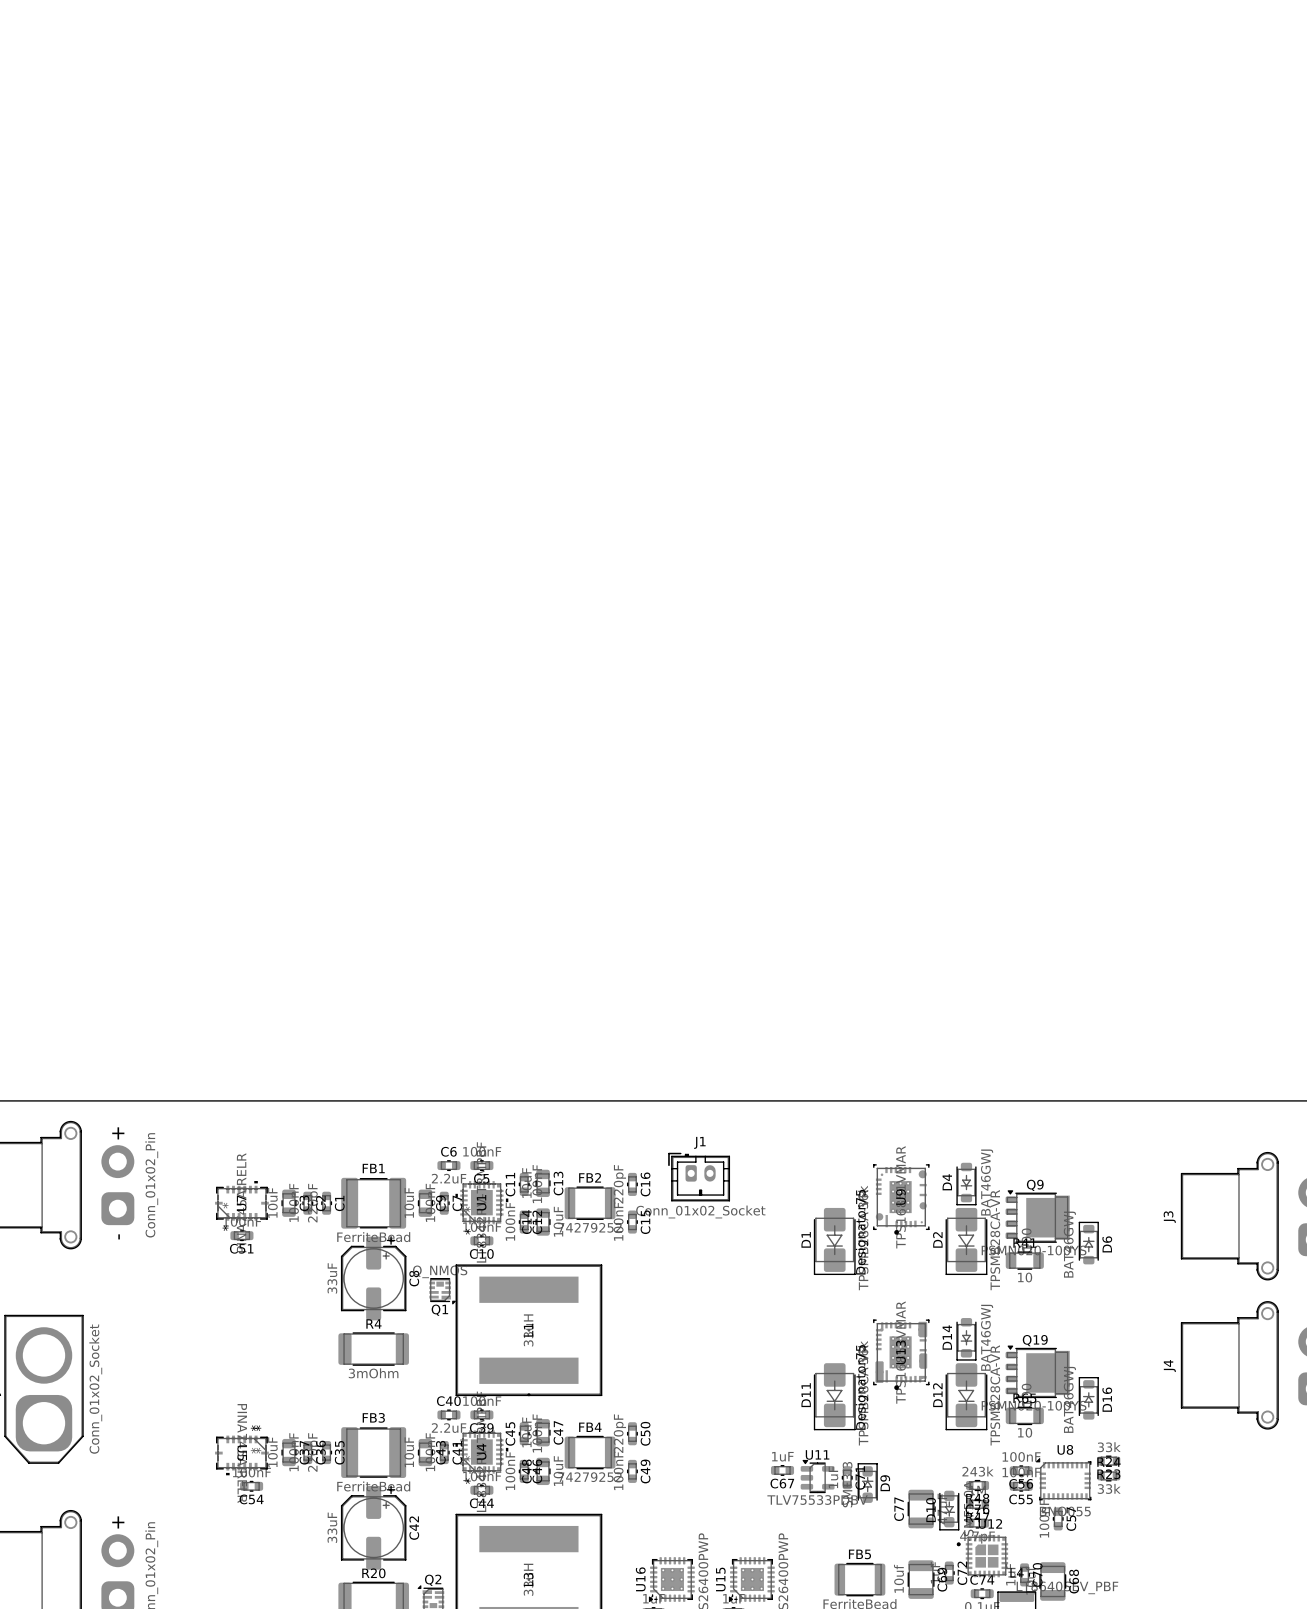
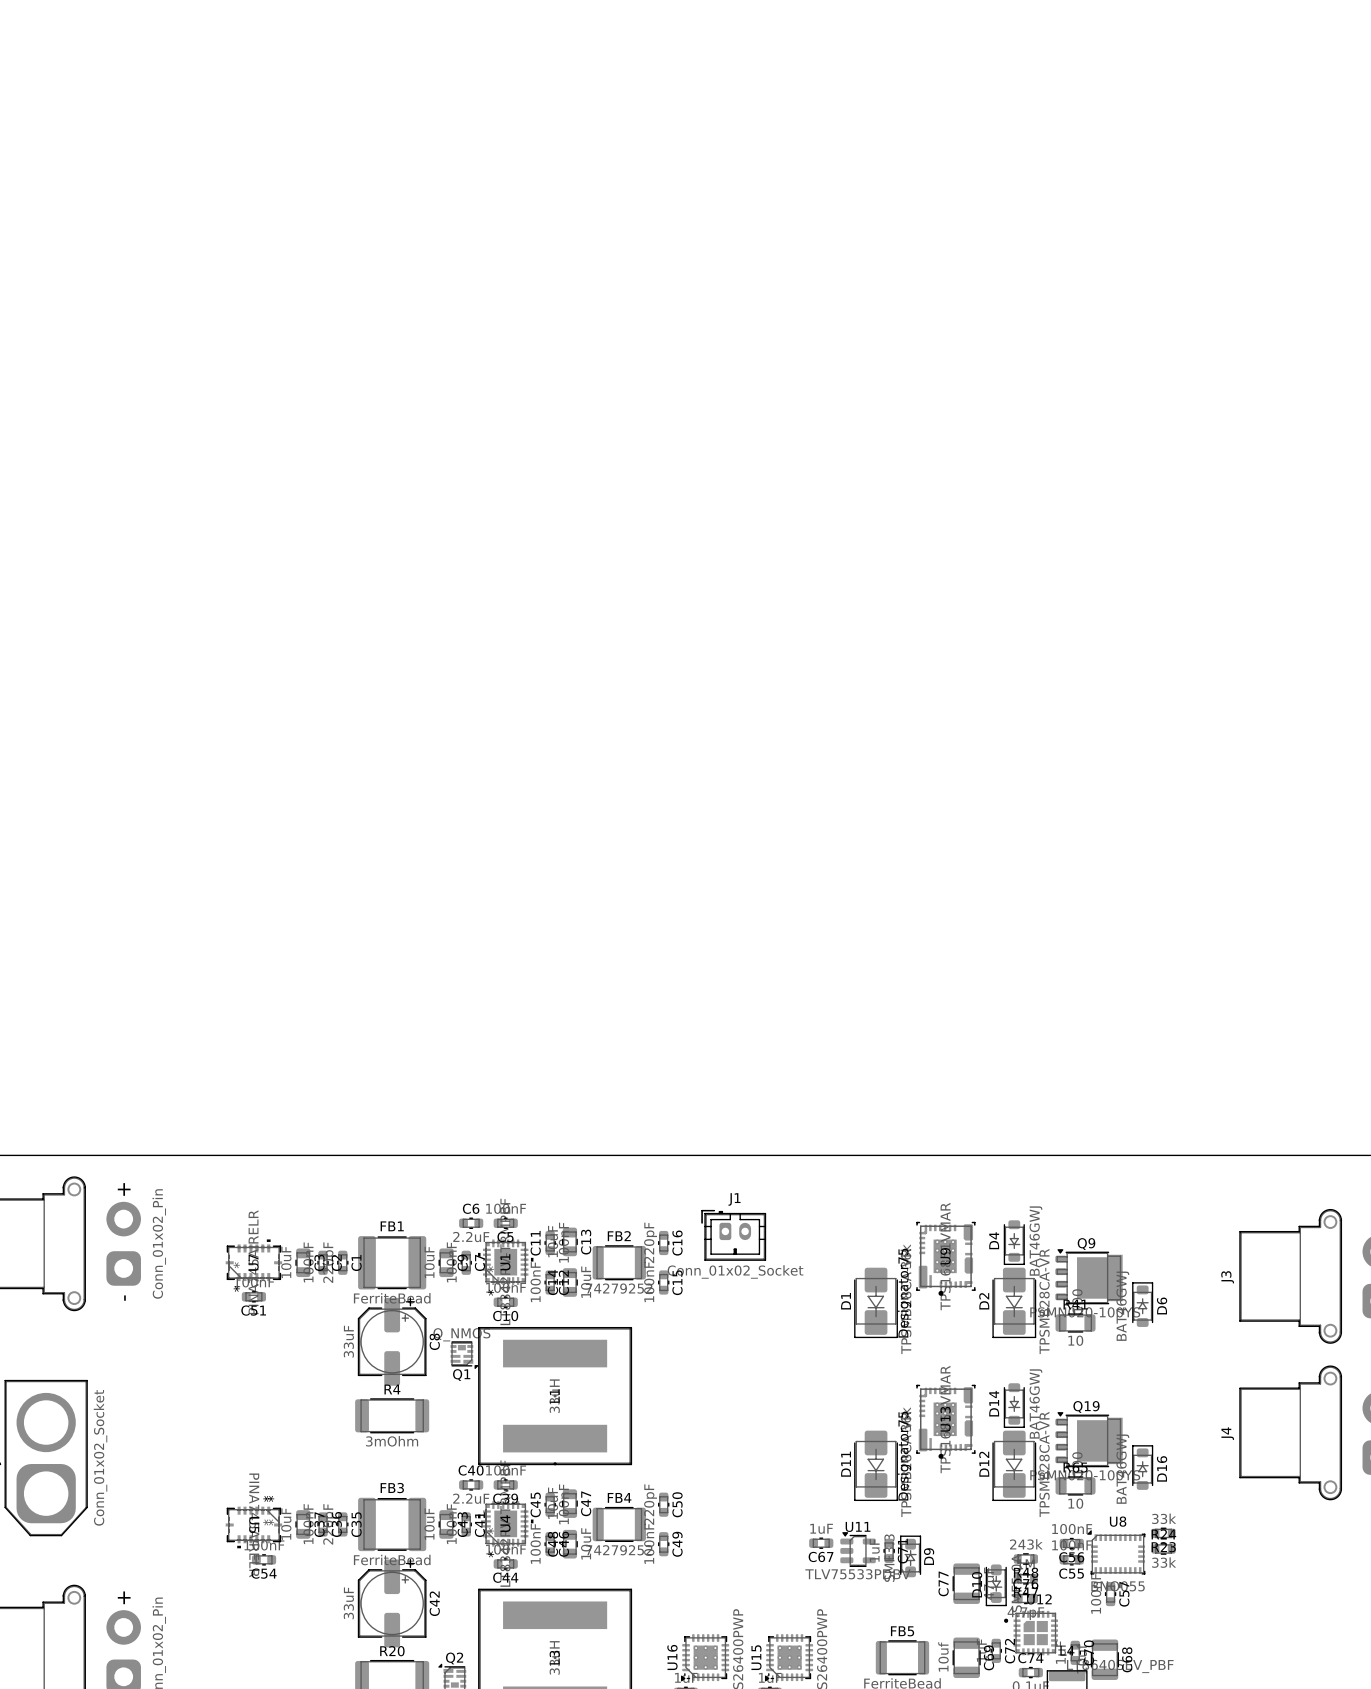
U9 footprint: [873, 1164, 930, 1235] -> [916, 1221, 976, 1296]

